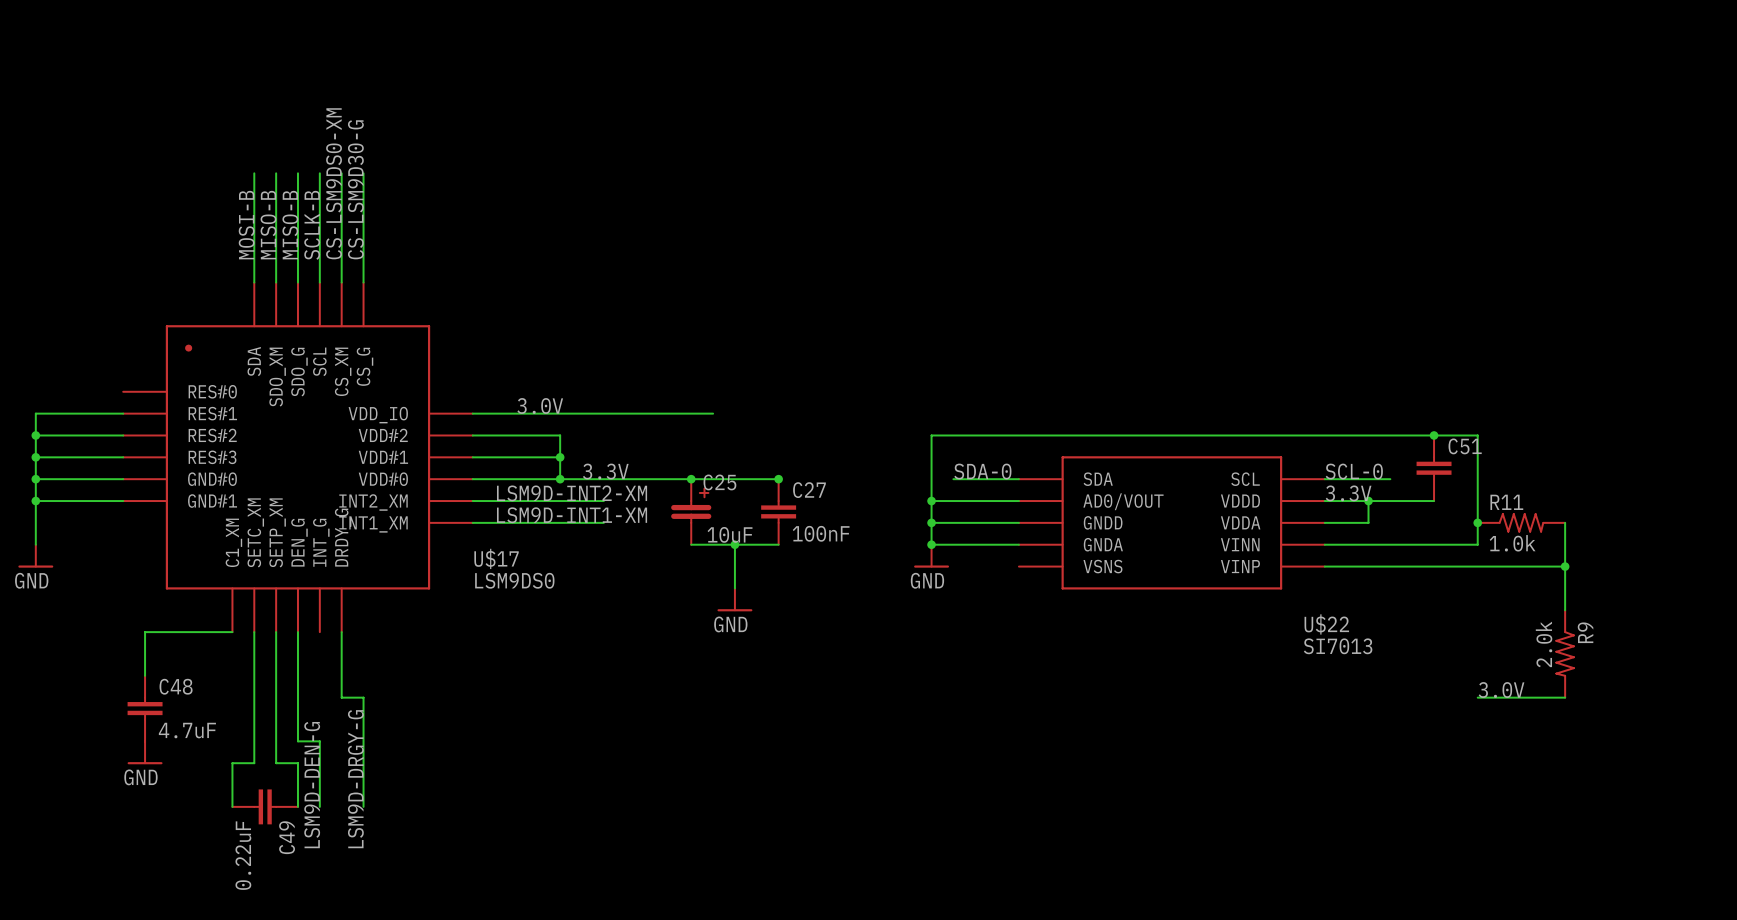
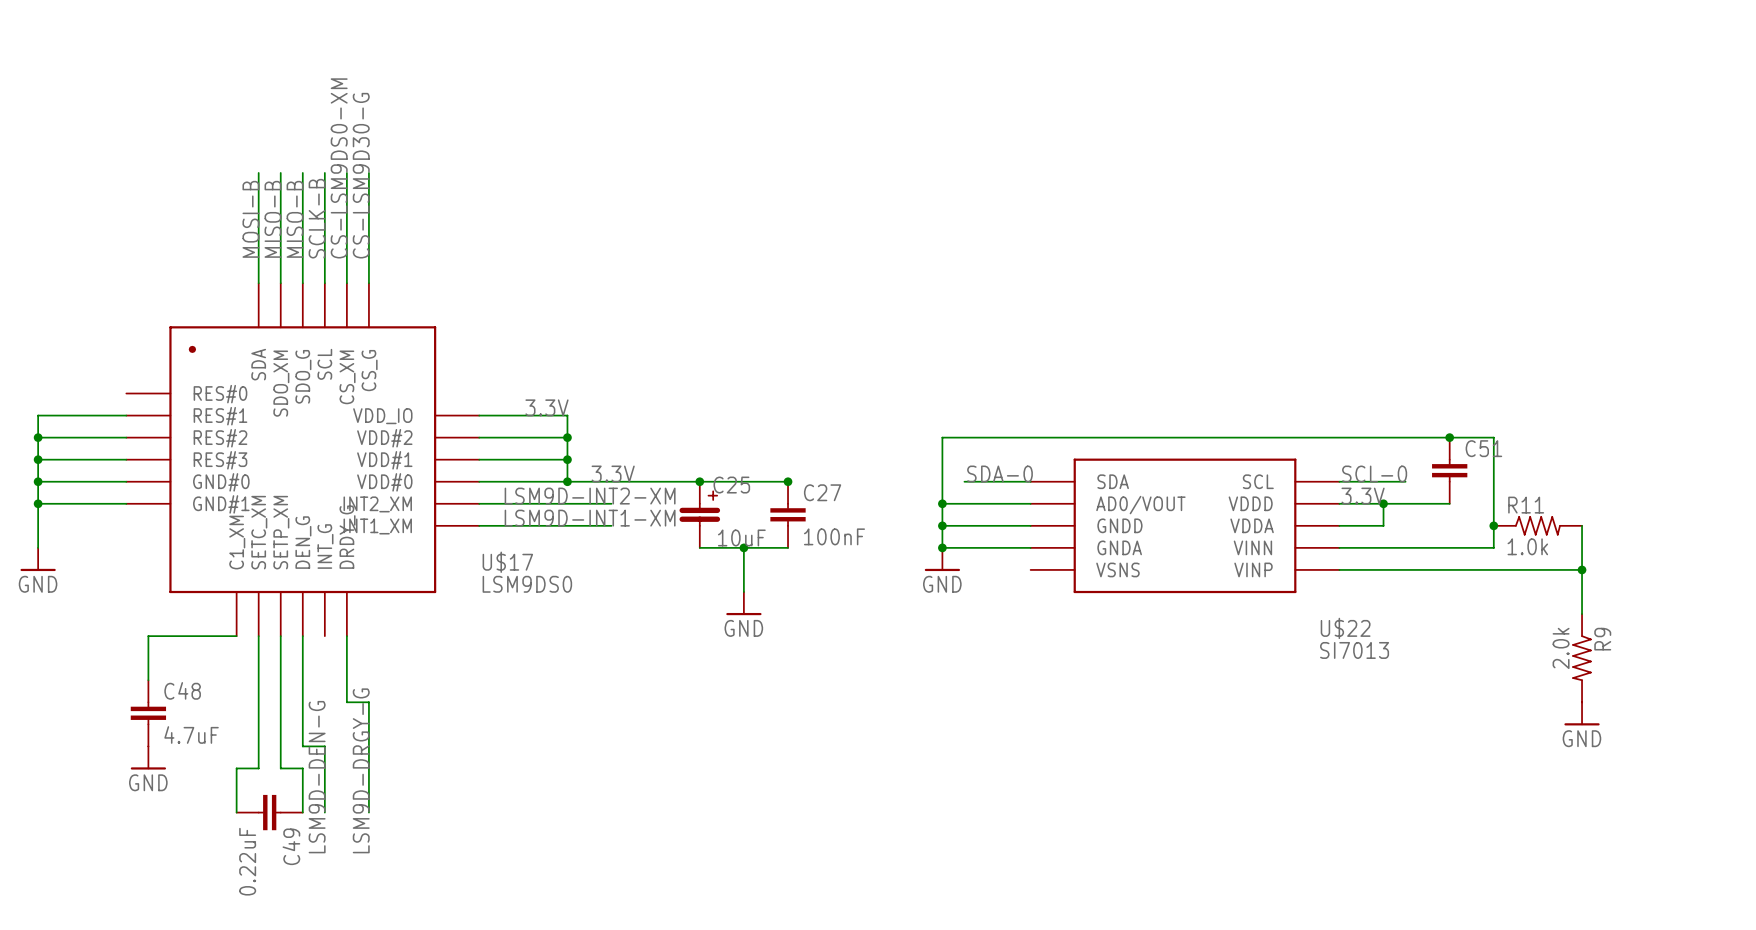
label: 3.0V (540, 405) -> 3.3V (546, 407)
wire: (560, 413) (713, 413) -> (567, 415) (567, 437)
junction: none -> (567, 437)
label: 3.0V (1501, 690) -> none
wire: (1477, 697) (1565, 697) -> none
power symbol: none -> GND (1582, 713)

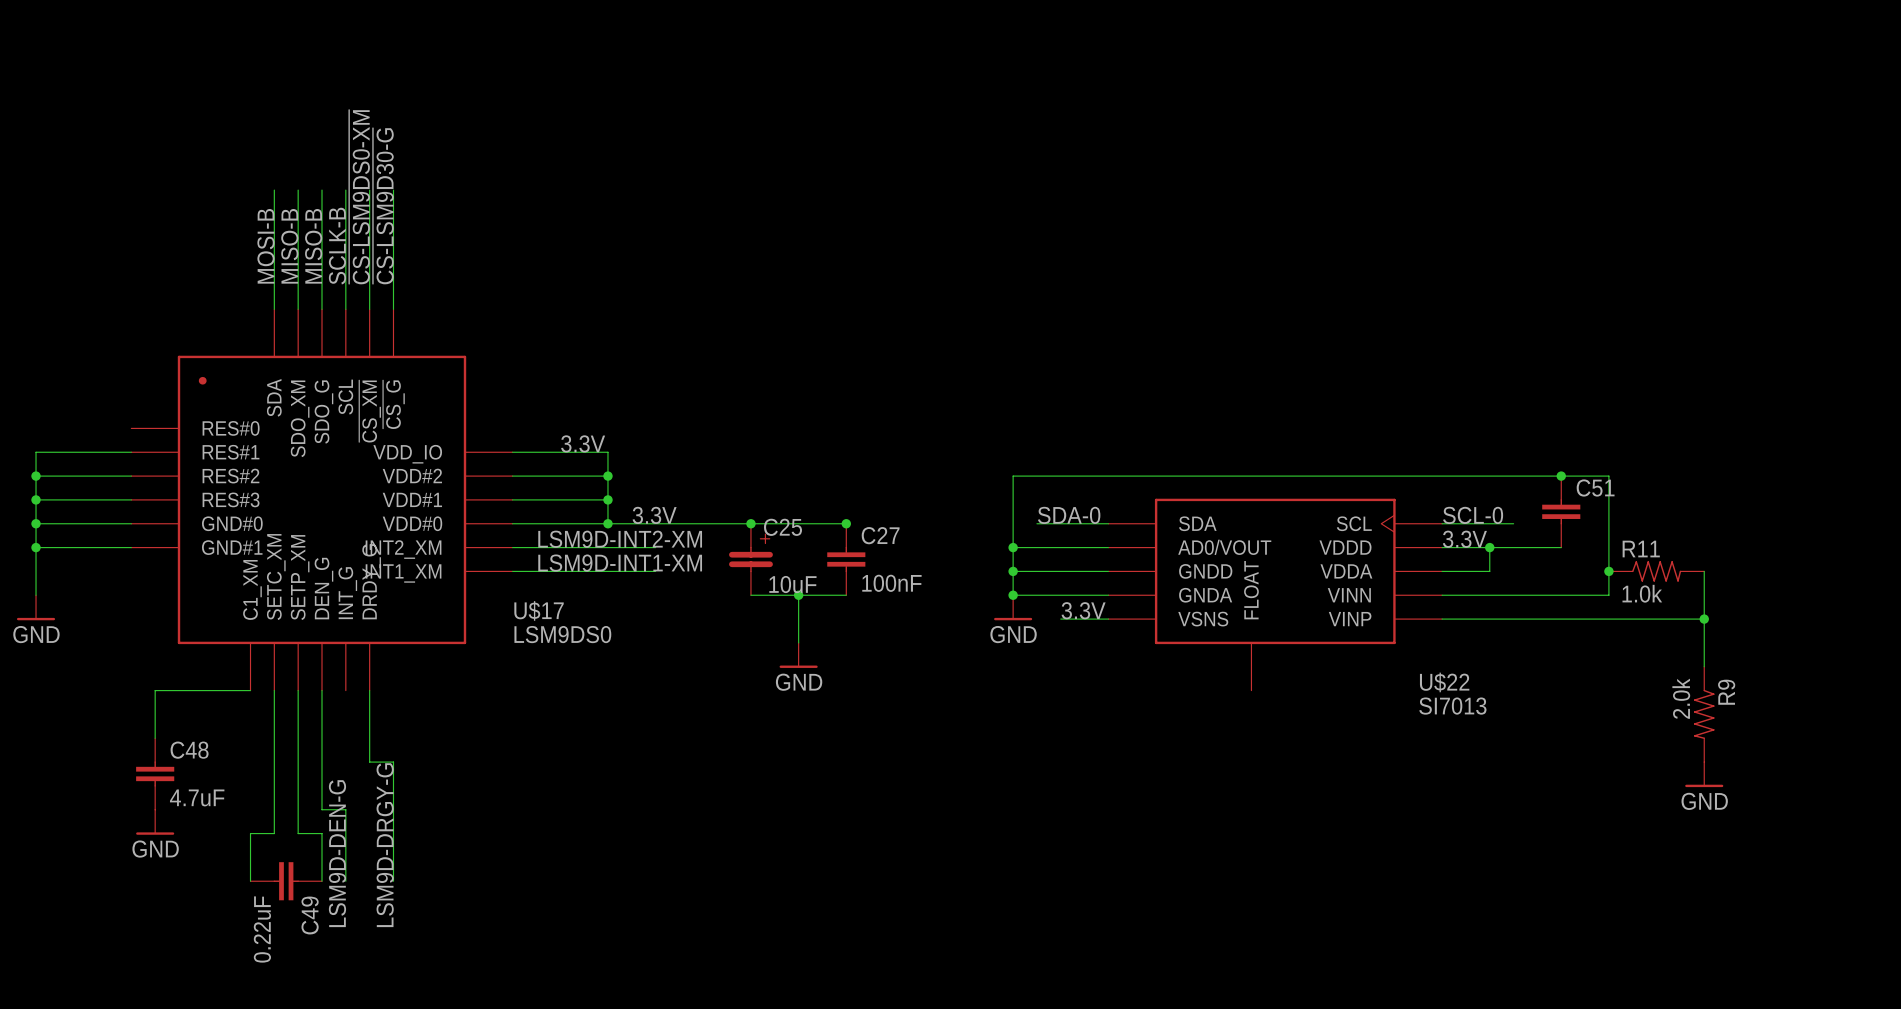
label: CS-LSM9DS0-XM (339, 168) -> ~{CS-LSM9DS0-XM} (359, 197)
label: CS-LSM9D30-G (361, 175) -> ~{CS-LSM9D30-G} (383, 206)
U$17 pin name: CS_G (369, 370) -> ~{CS_G} (393, 404)
U$17 pin name: CS_XM (347, 377) -> ~{CS_XM} (370, 411)
U$22 symbol: [1030, 458, 1340, 594] -> [1108, 498, 1443, 691]
label: none -> 3.3V (1083, 610)
wire: none -> (1060, 619) (1108, 619)

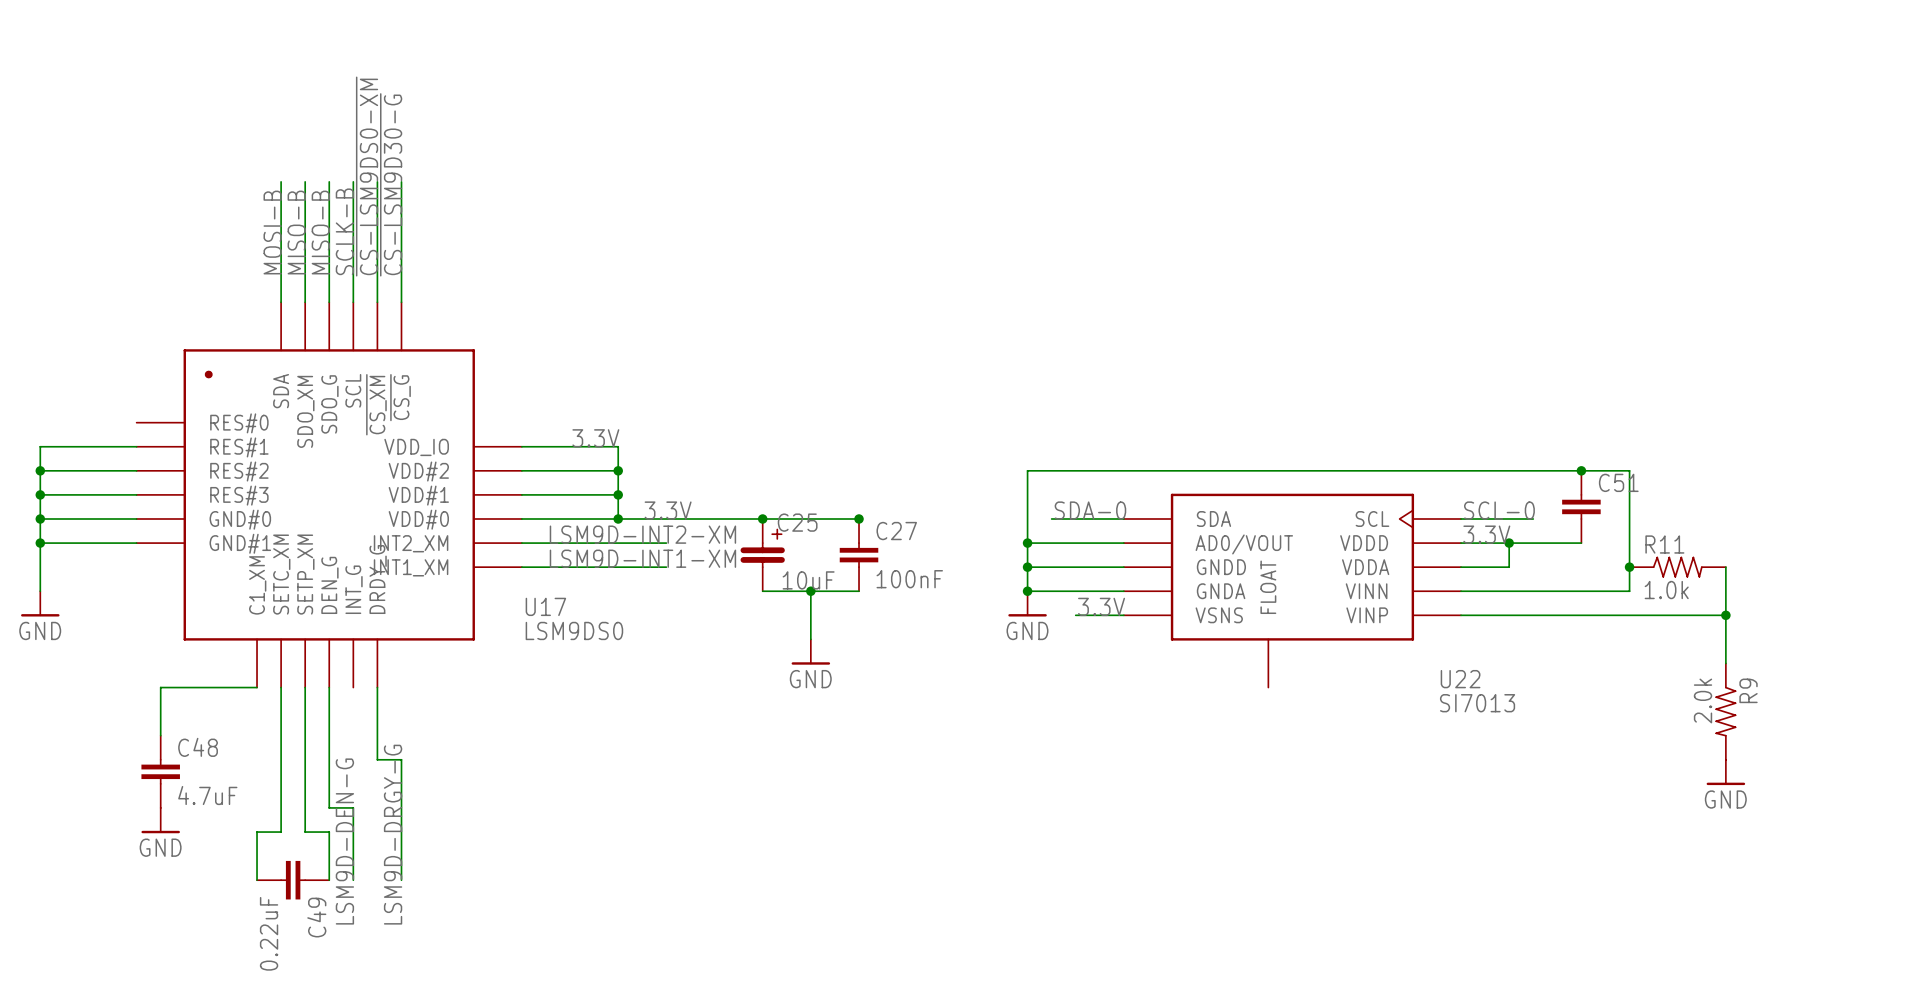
U$17 name: U$17 (539, 610) -> U17 (545, 606)
U$22 name: U$22 (1444, 682) -> U22 (1460, 679)

